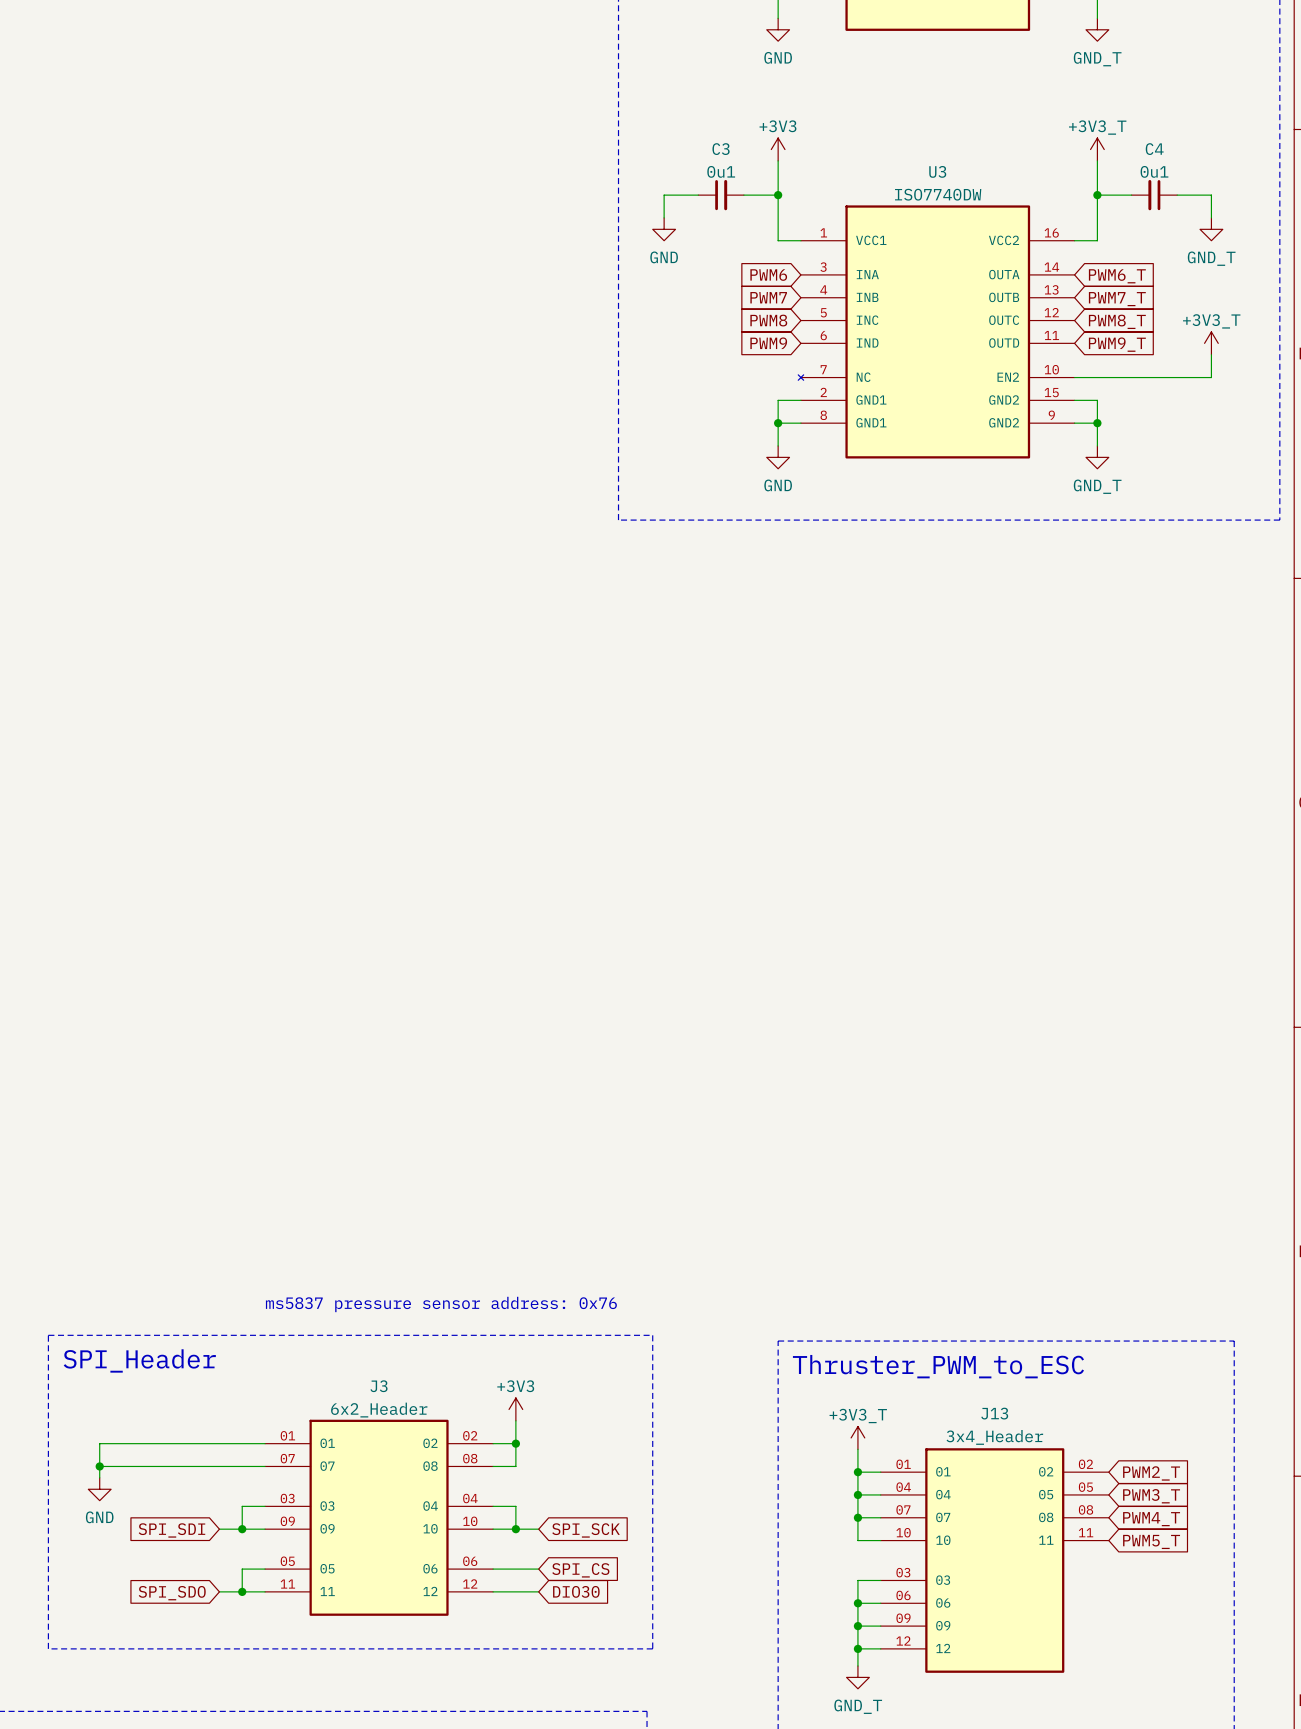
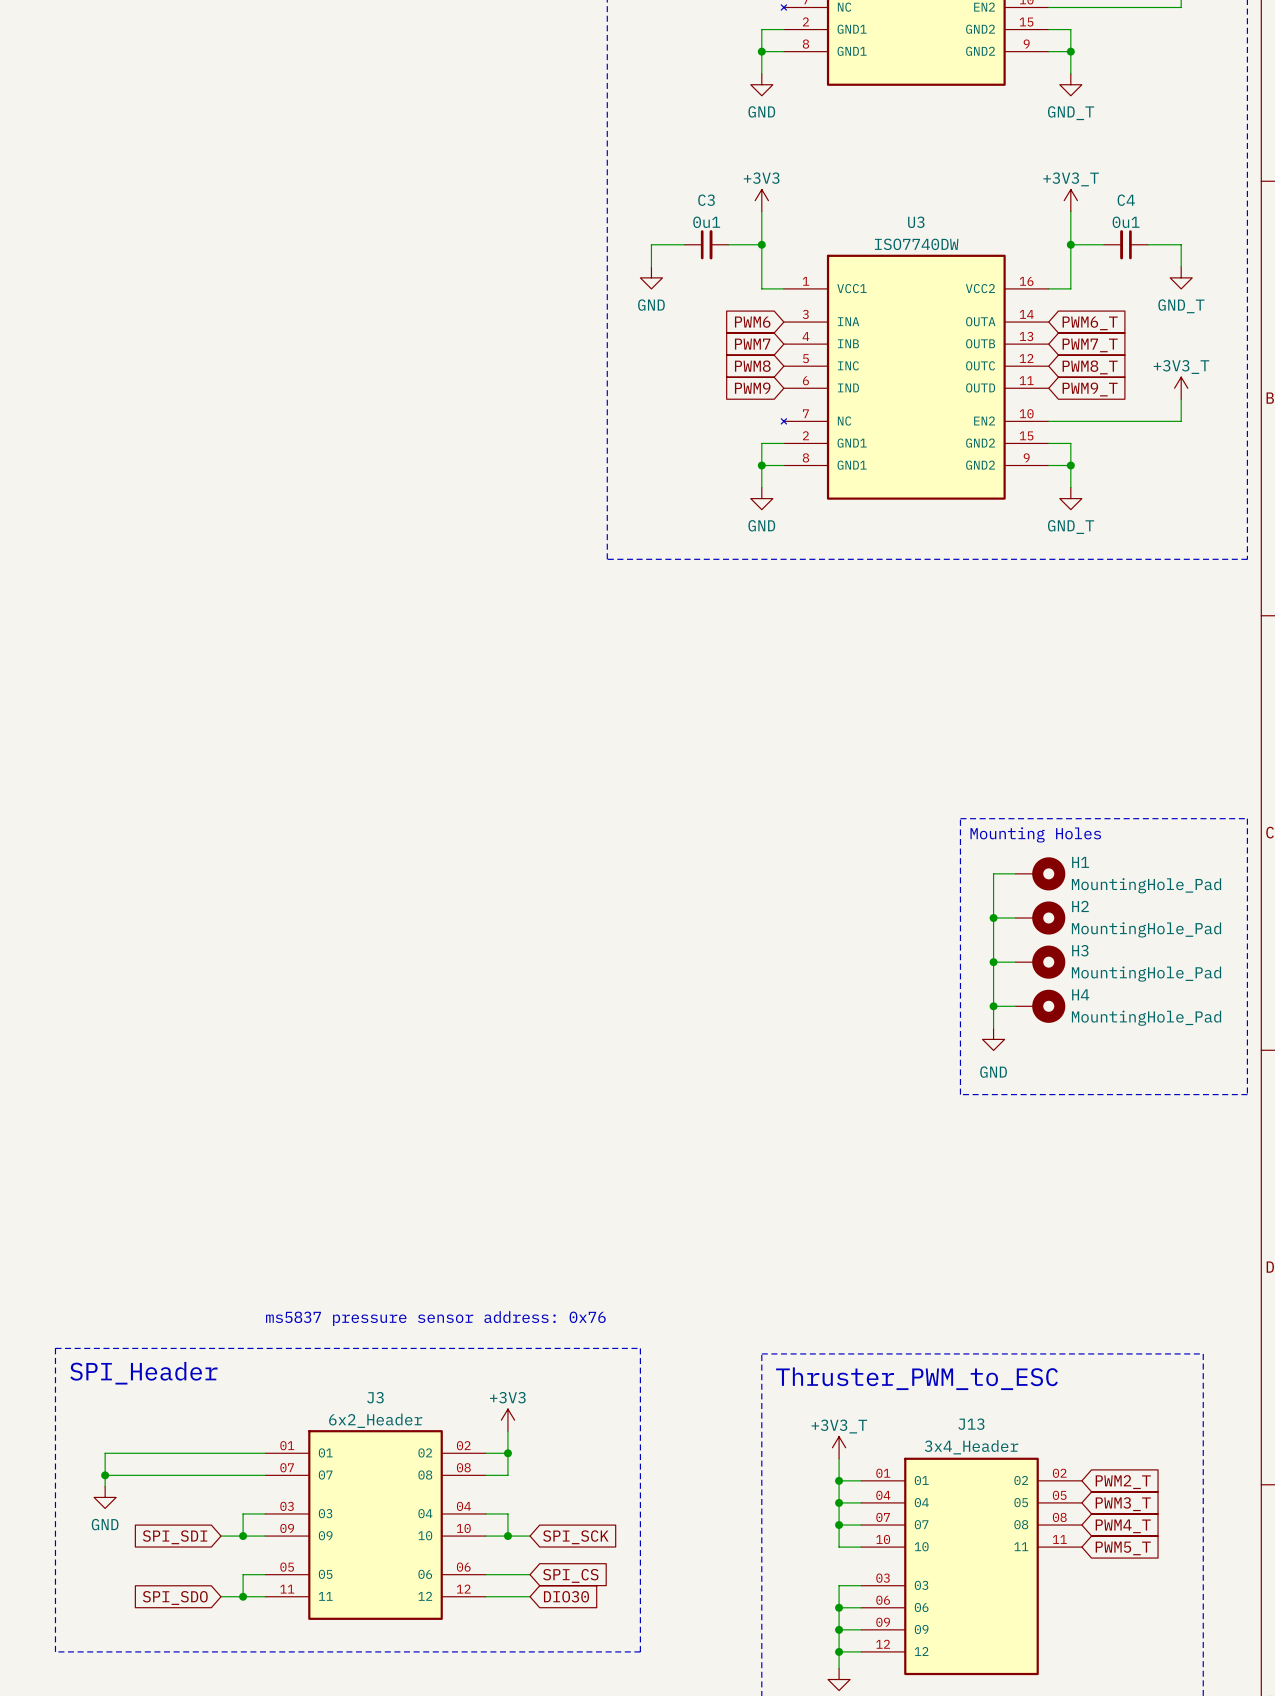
line: none -> (960, 818) (1247, 818) (1247, 1094) (960, 1094) (960, 818)
text: none -> Mounting Holes (1035, 834)
wire: none -> (1015, 873) (993, 873) (993, 1028)
H1: none -> MountingHole_Pad (1040, 873)
wire: none -> (993, 918) (1015, 918)
junction: none -> (993, 918)
H2: none -> MountingHole_Pad (1040, 918)
wire: none -> (993, 962) (1015, 962)
junction: none -> (993, 962)
H3: none -> MountingHole_Pad (1040, 962)
wire: none -> (993, 1006) (1015, 1006)
junction: none -> (993, 1006)
H4: none -> MountingHole_Pad (1040, 1006)
power symbol: none -> GND (993, 1039)

